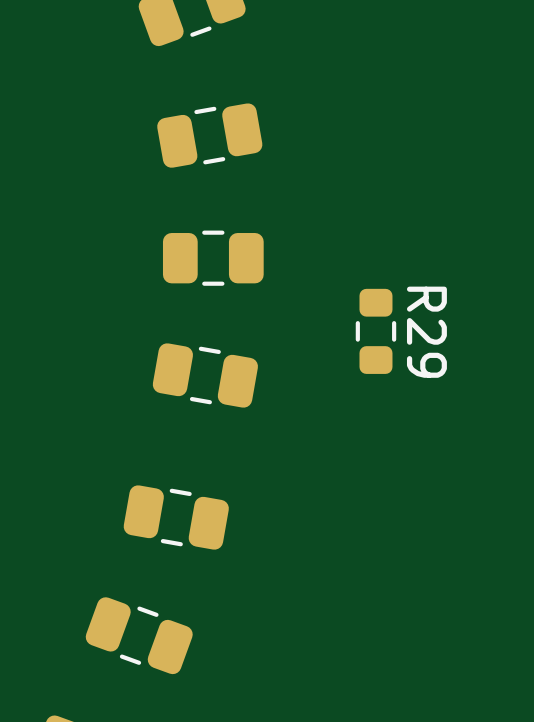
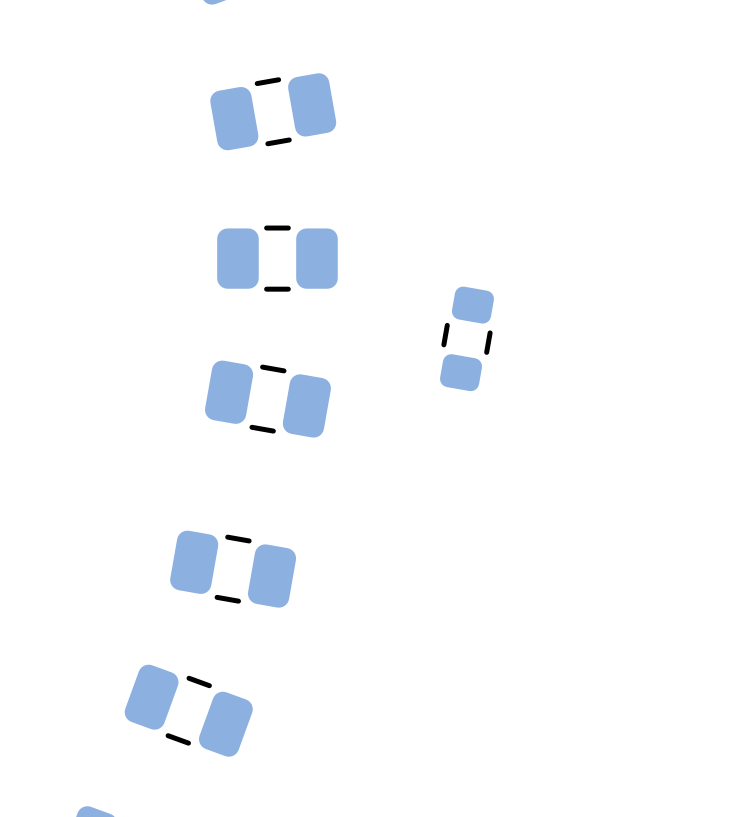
part: none -> (466, 338)
R29: (375, 331) -> none

